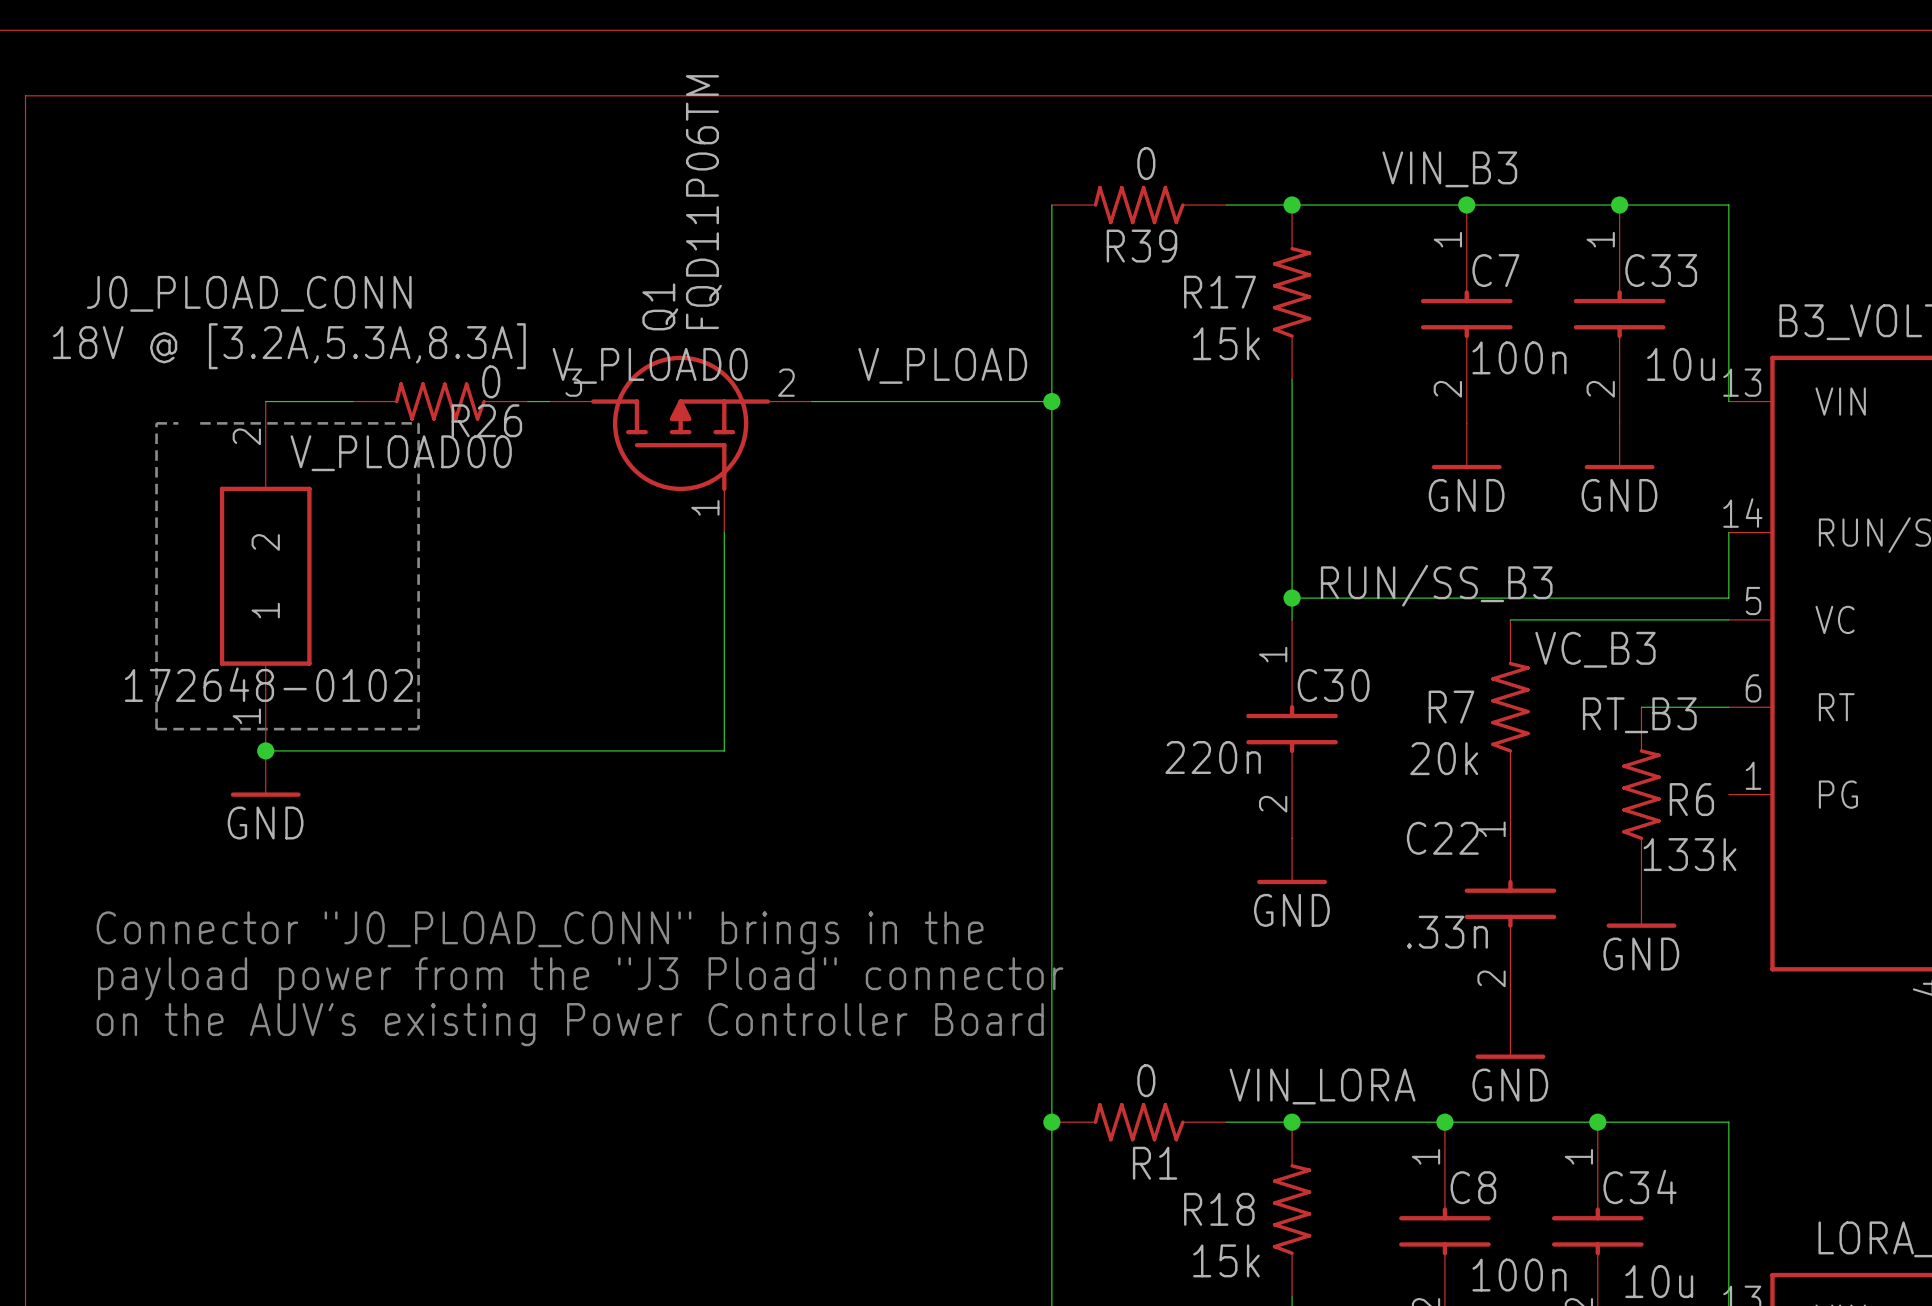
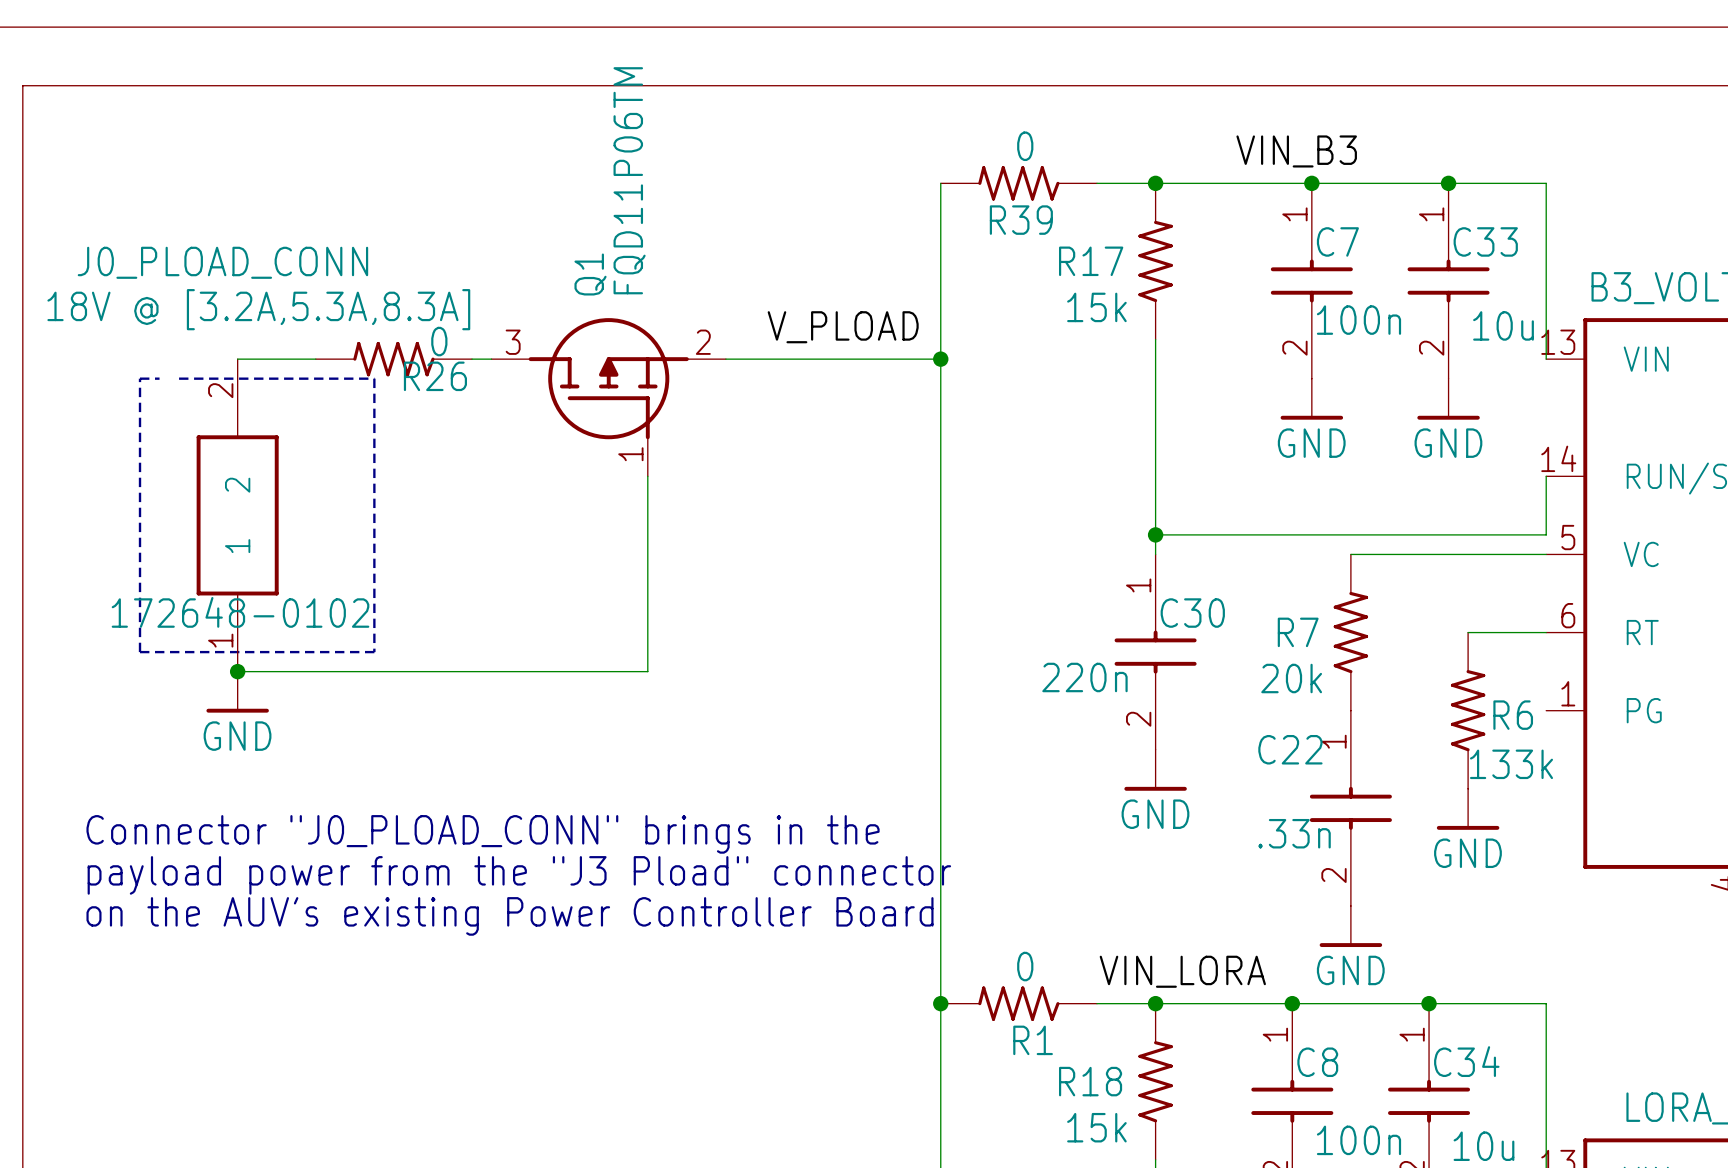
label: V_PLOAD0 (650, 365) -> none
label: V_PLOAD00 (401, 453) -> none
label: RUN/SS_B3 (1436, 585) -> none
label: VC_B3 (1595, 649) -> none
label: RT_B3 (1639, 715) -> none

